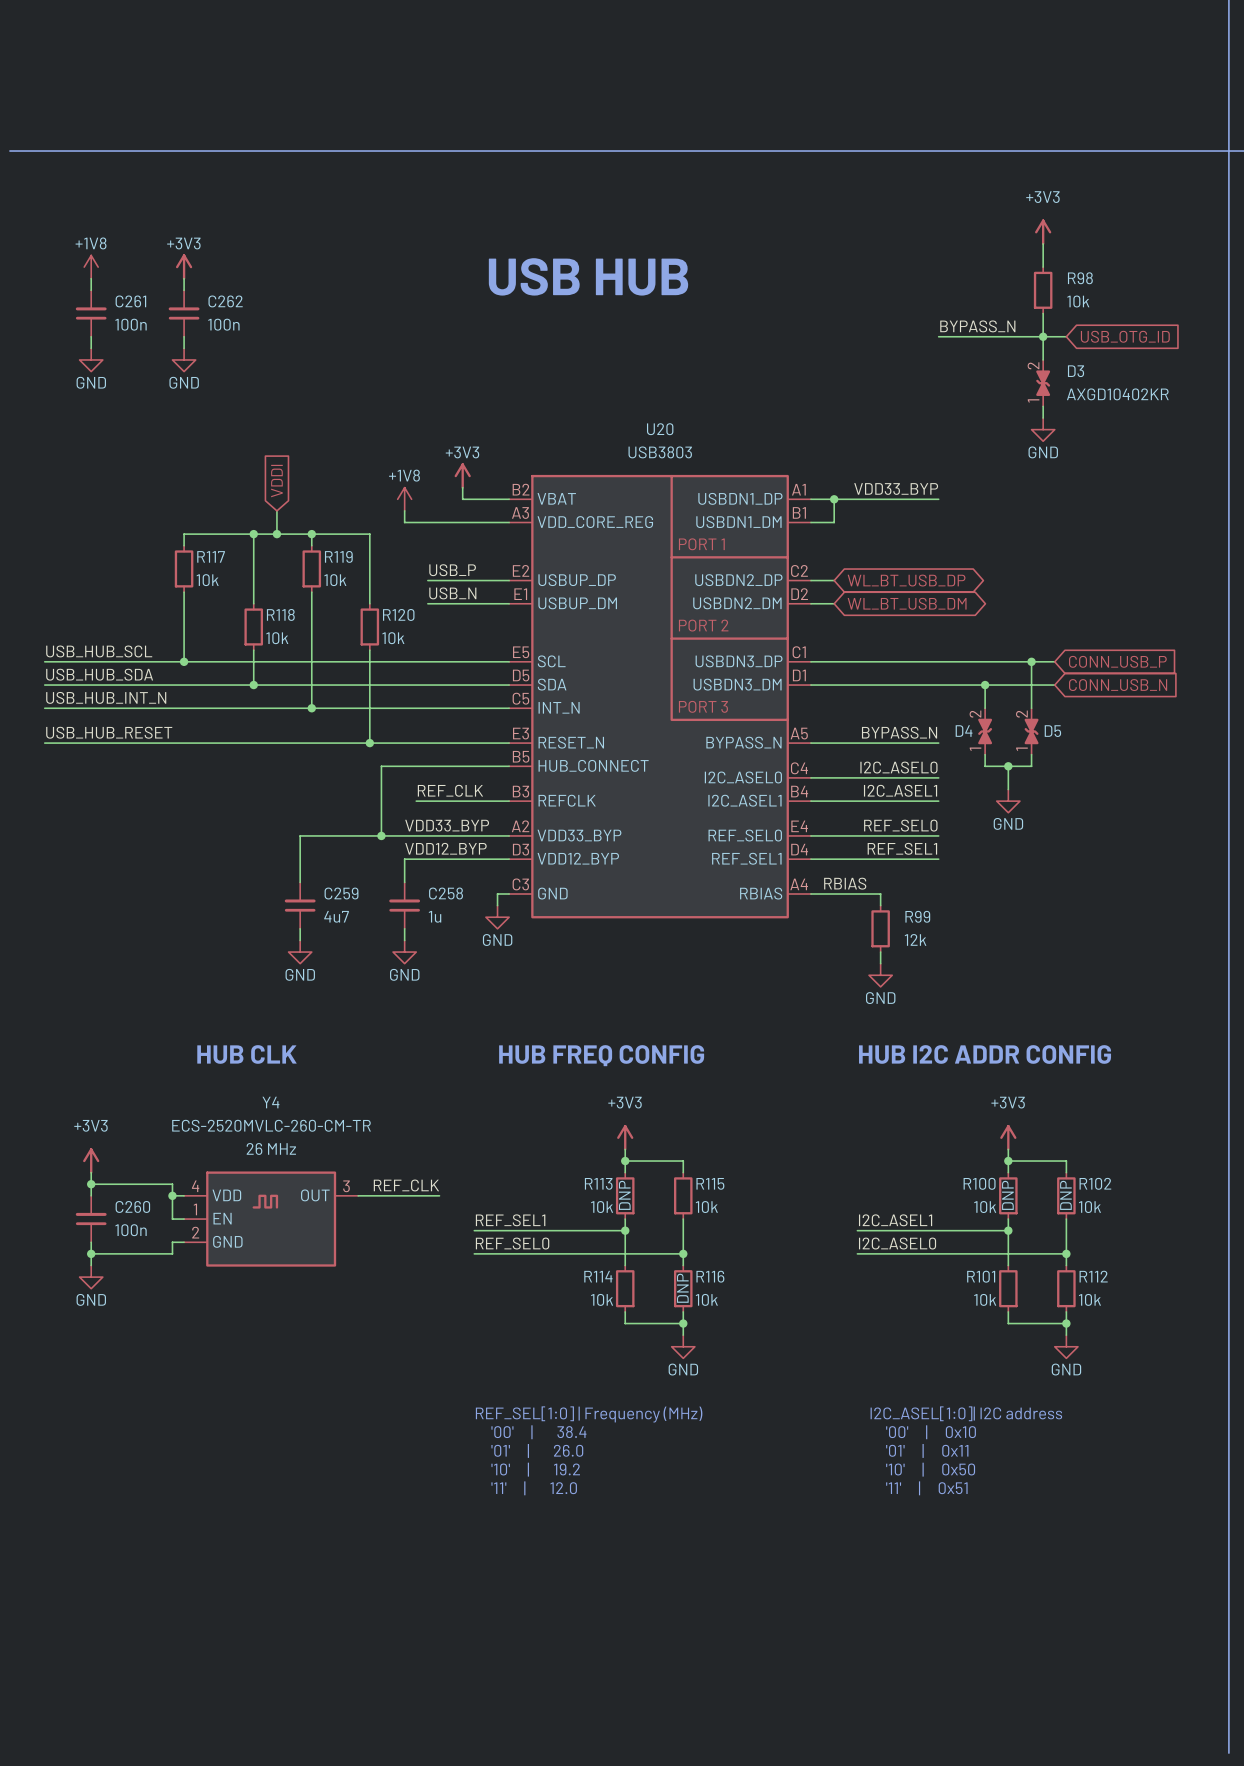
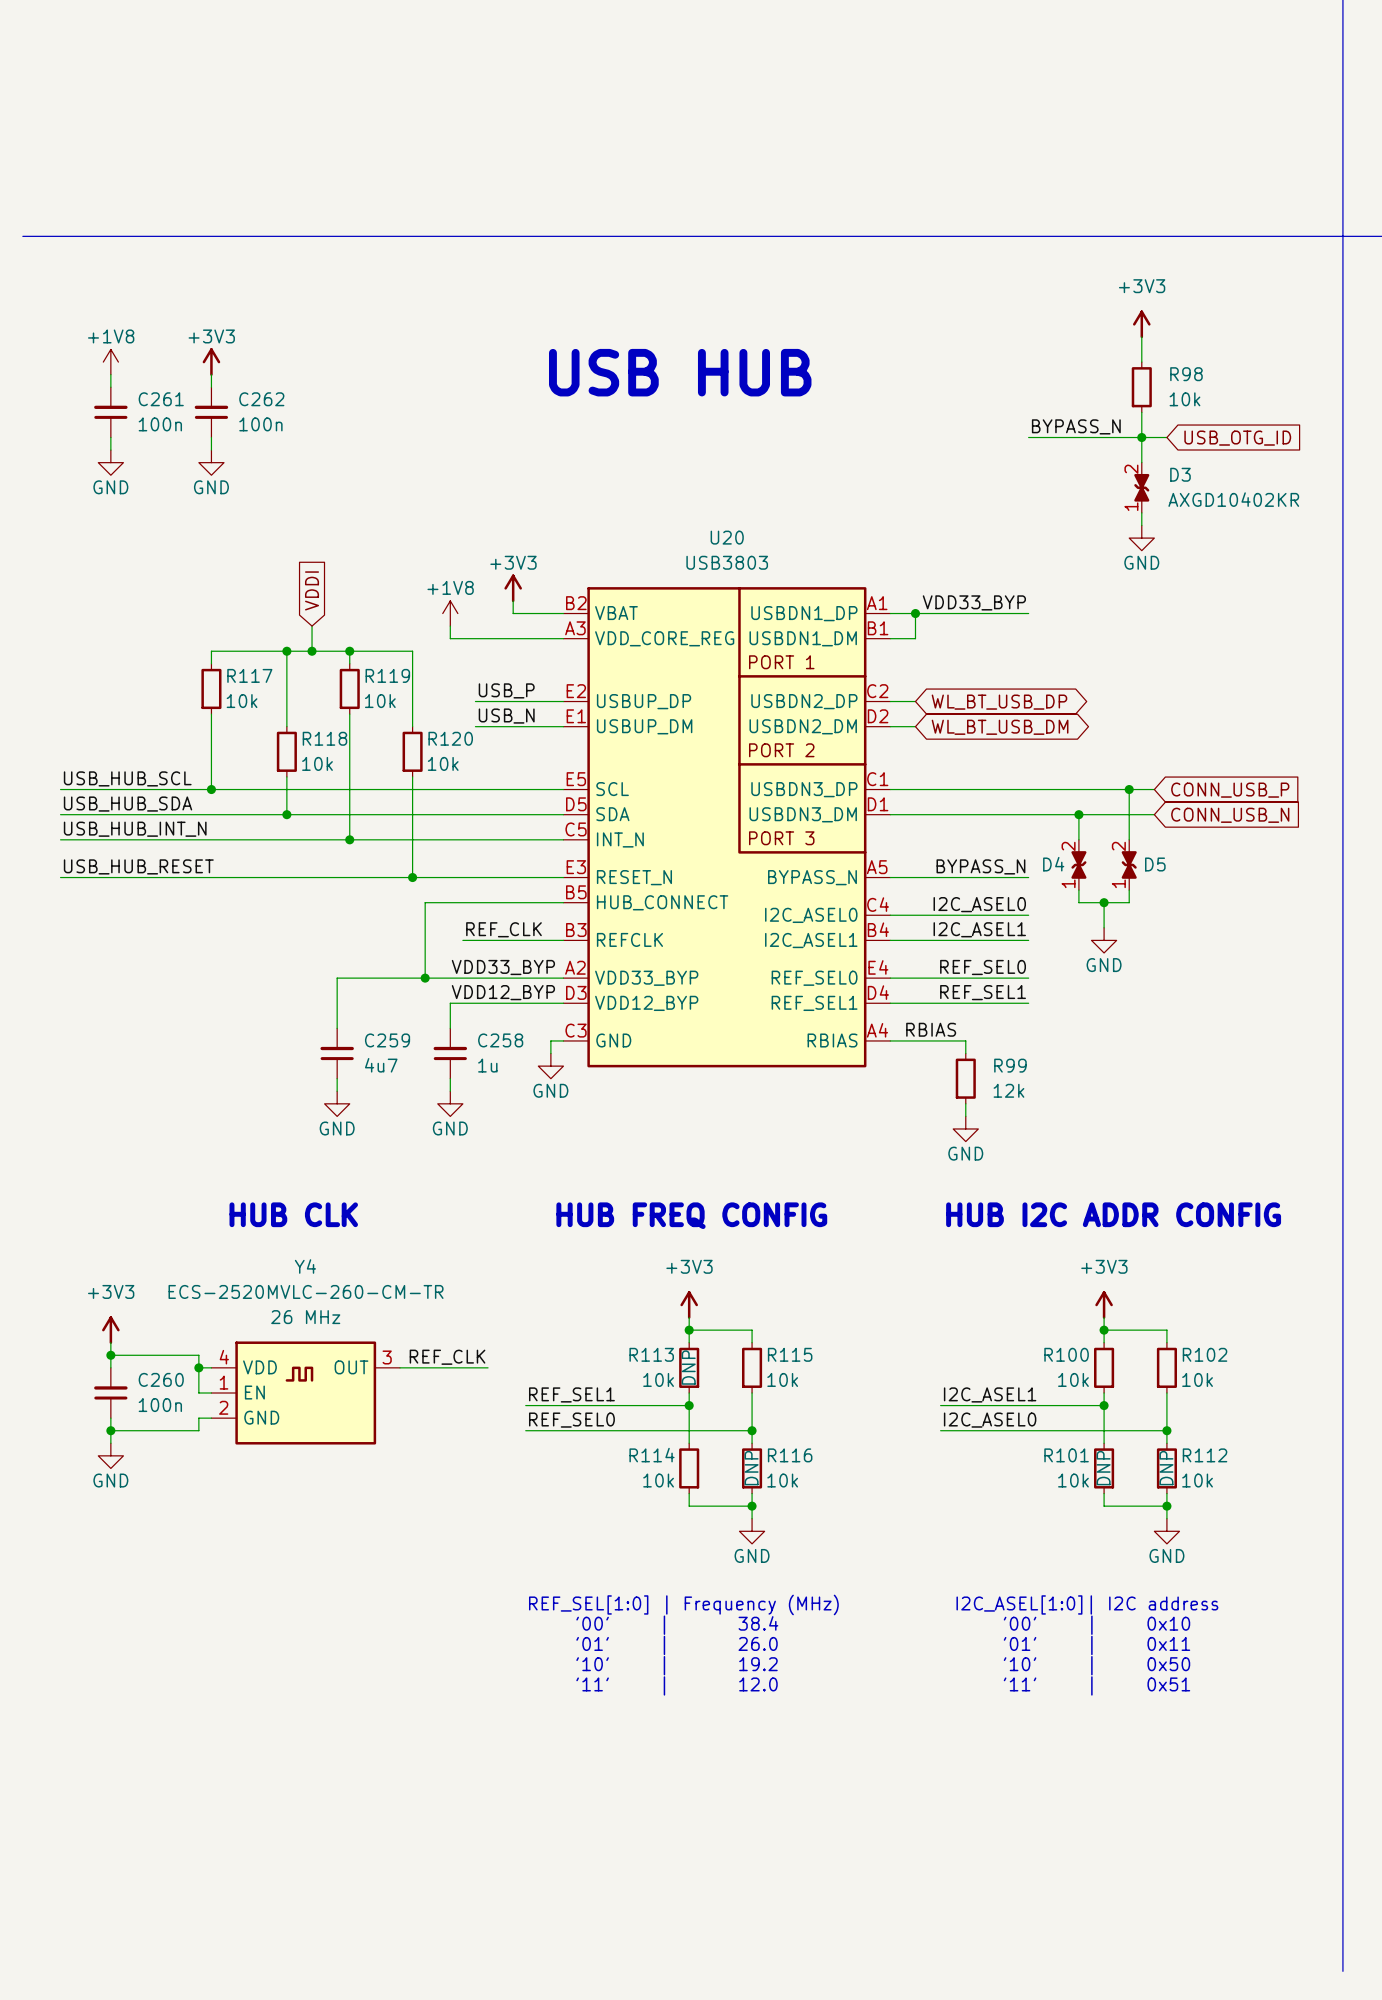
R100 text: DNP (1007, 1195) -> none
R102 text: DNP (1065, 1195) -> none
R101 text: none -> DNP (1103, 1468)
R112 text: none -> DNP (1166, 1468)

